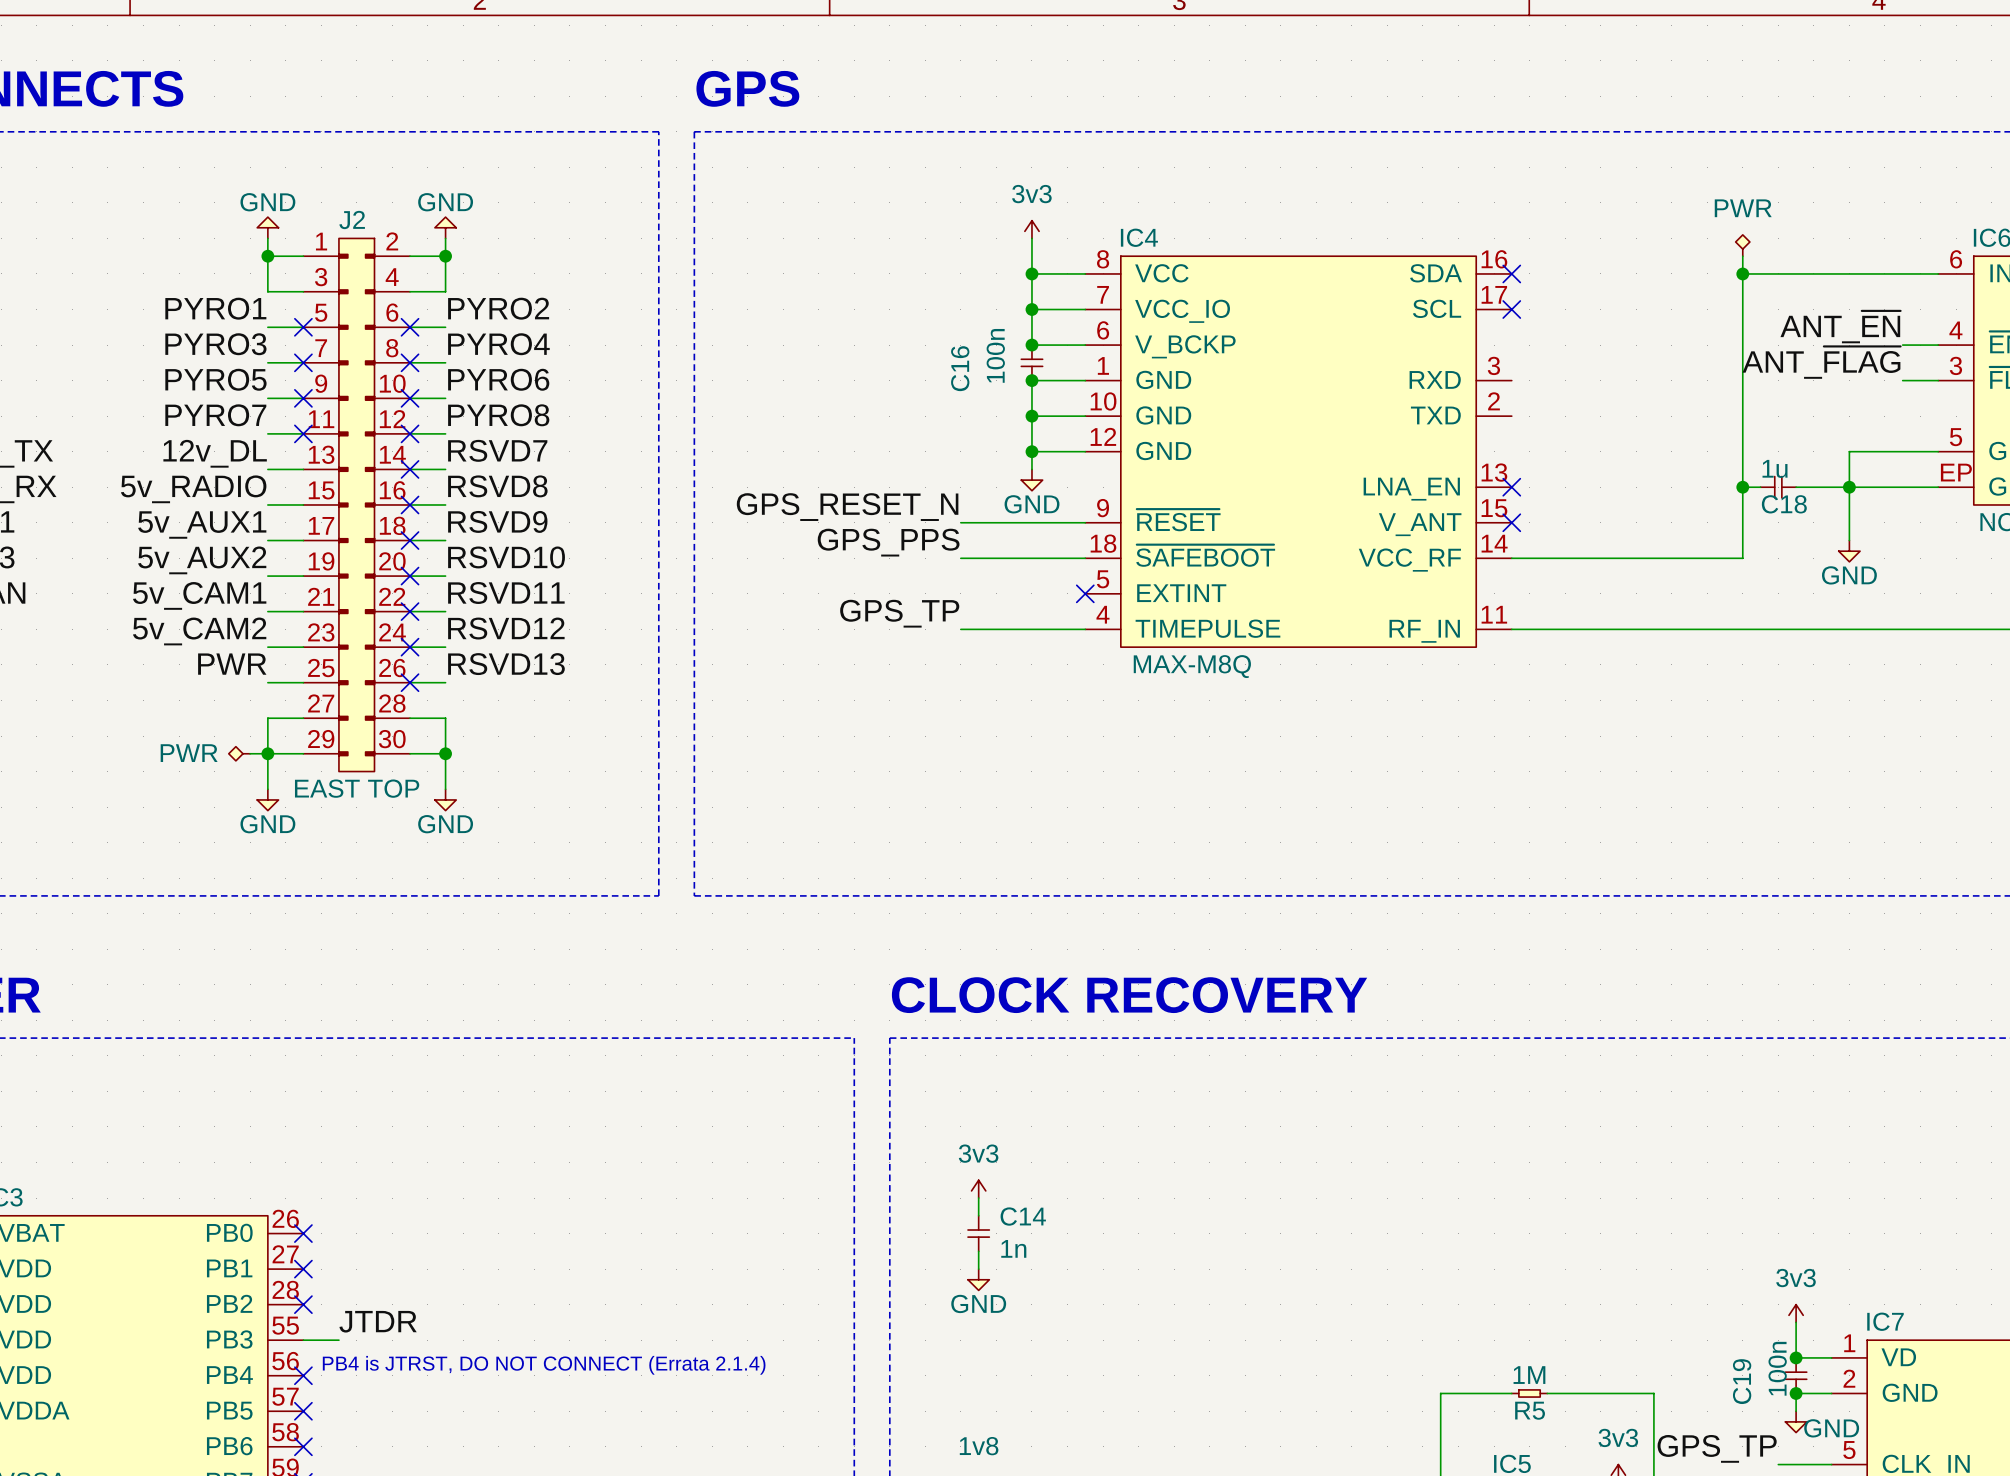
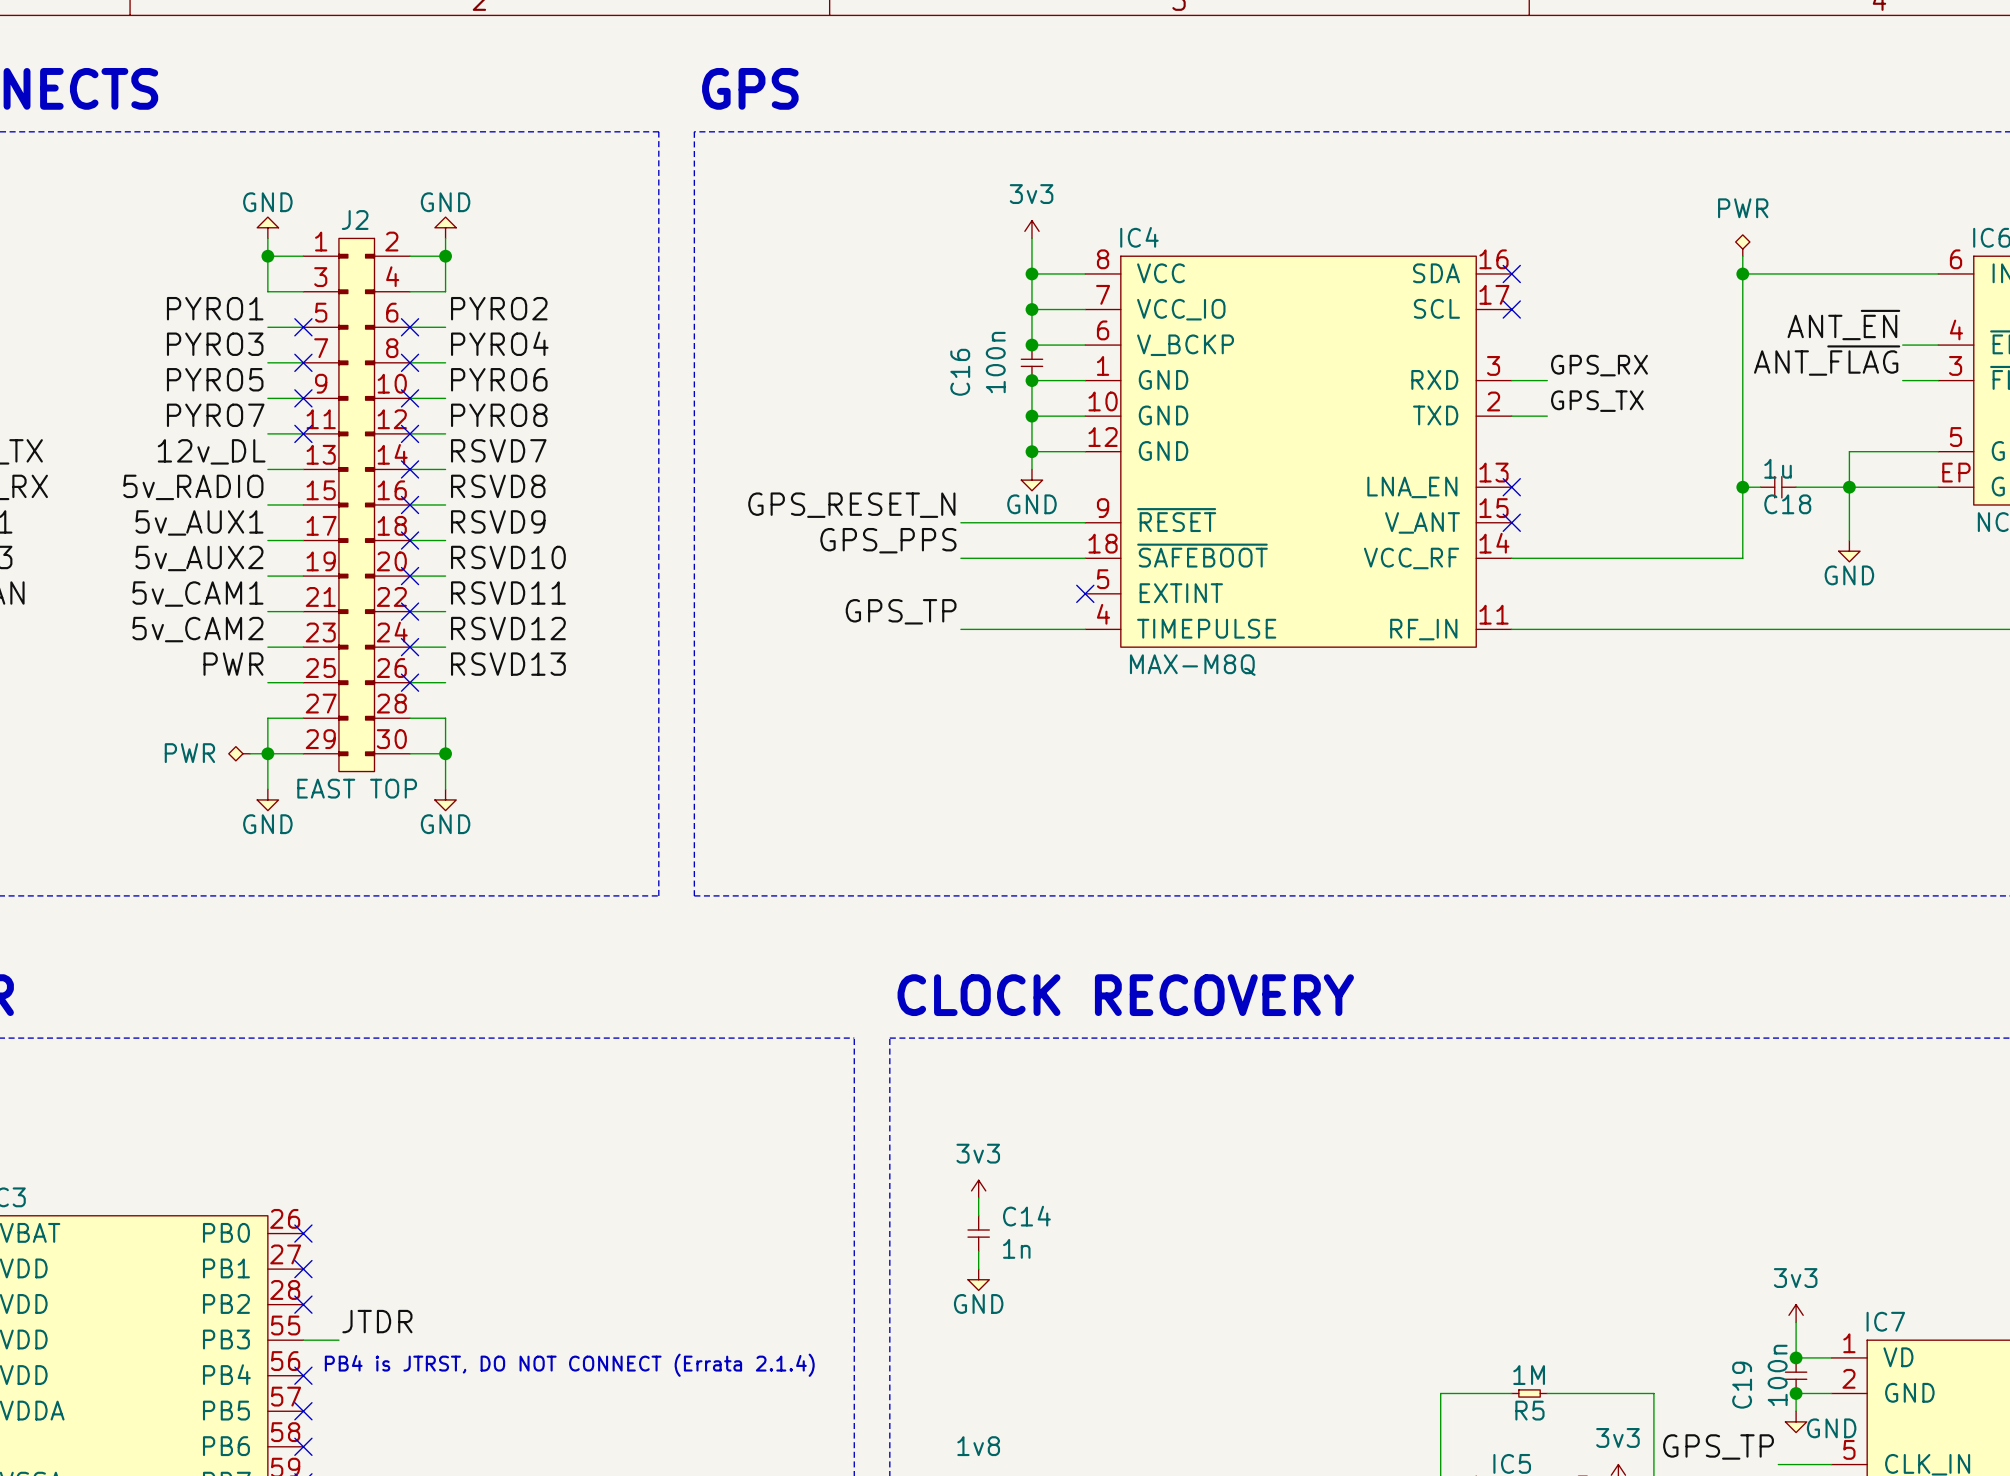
label: none -> GPS_RX (1599, 365)
wire: none -> (1511, 380) (1547, 380)
label: none -> GPS_TX (1597, 401)
wire: none -> (1511, 416) (1547, 416)

